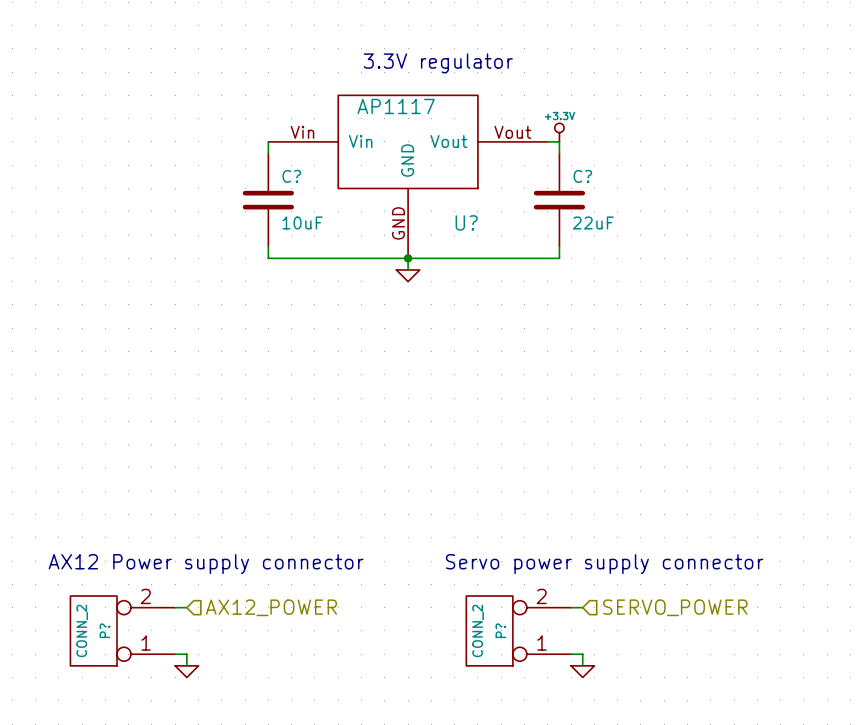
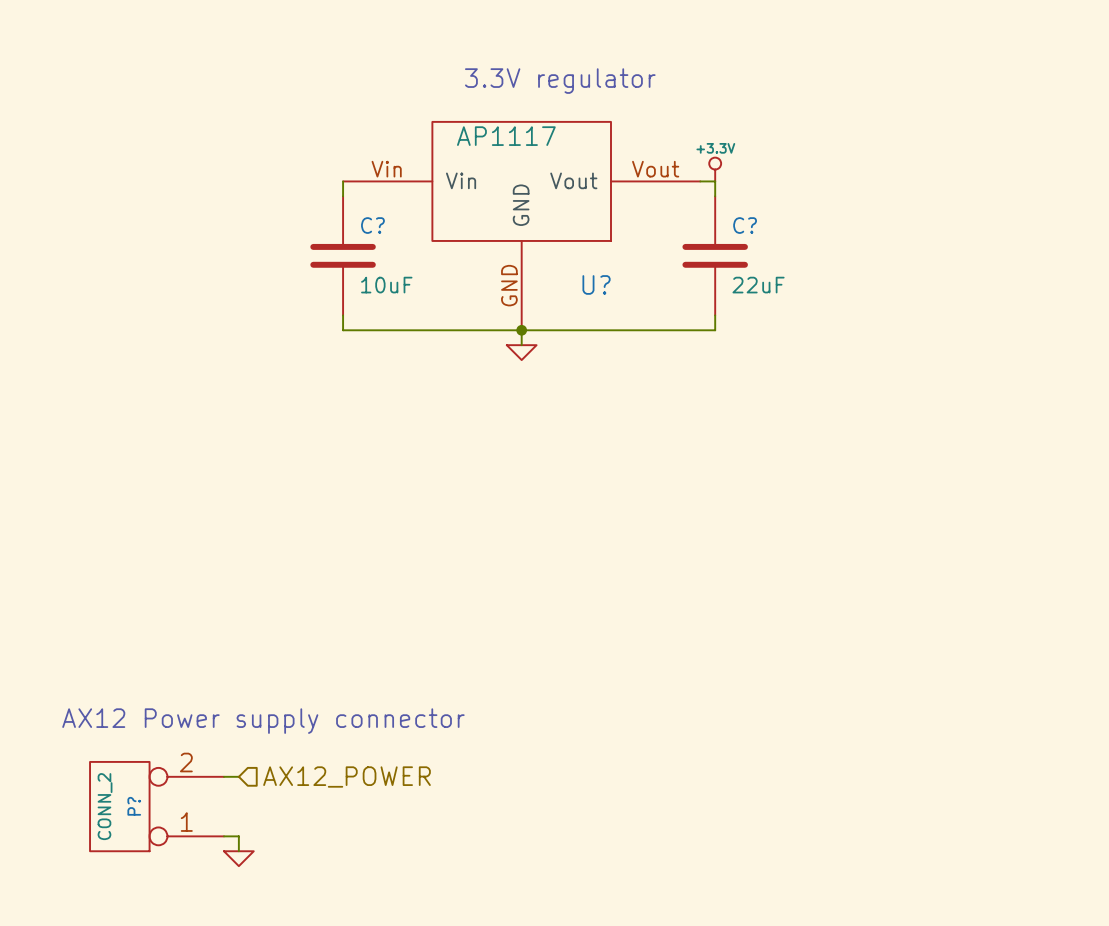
text: Servo power supply connector (604, 564) -> none
wire: (571, 607) (582, 607) -> none
hierarchical label: SERVO_POWER (675, 607) -> none
P?: CONN_2 (518, 630) -> none
wire: (571, 654) (582, 654) (582, 665) -> none
power symbol: (582, 671) -> none

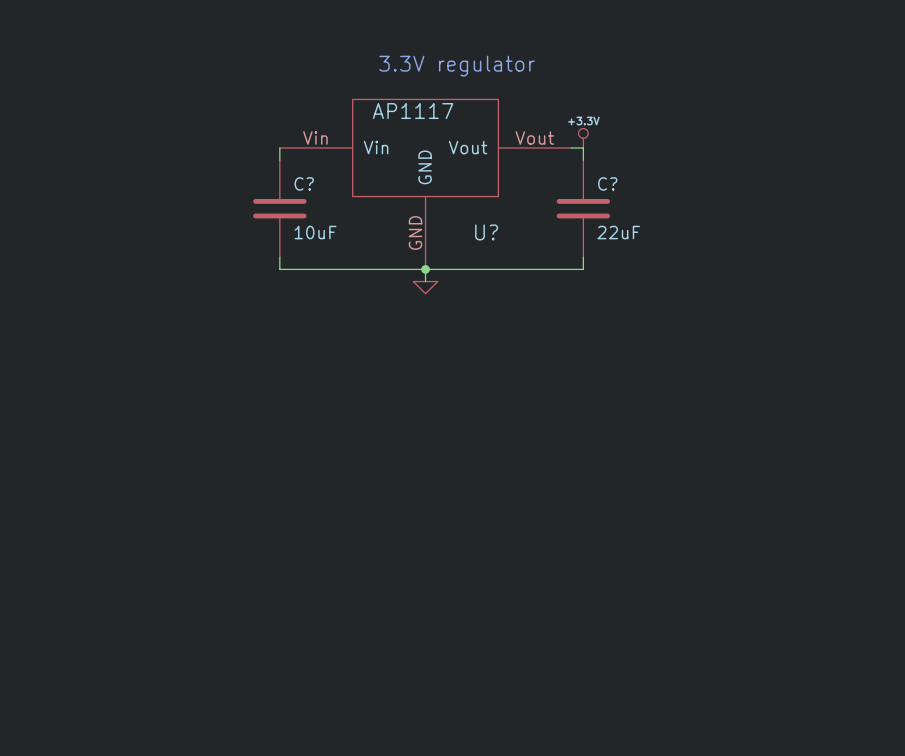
text: AX12 Power supply connector (263, 721) -> none
wire: (223, 776) (238, 776) -> none
hierarchical label: AX12_POWER (347, 777) -> none
P?: CONN_2 (157, 806) -> none
wire: (223, 836) (238, 836) (238, 851) -> none
power symbol: (238, 858) -> none

